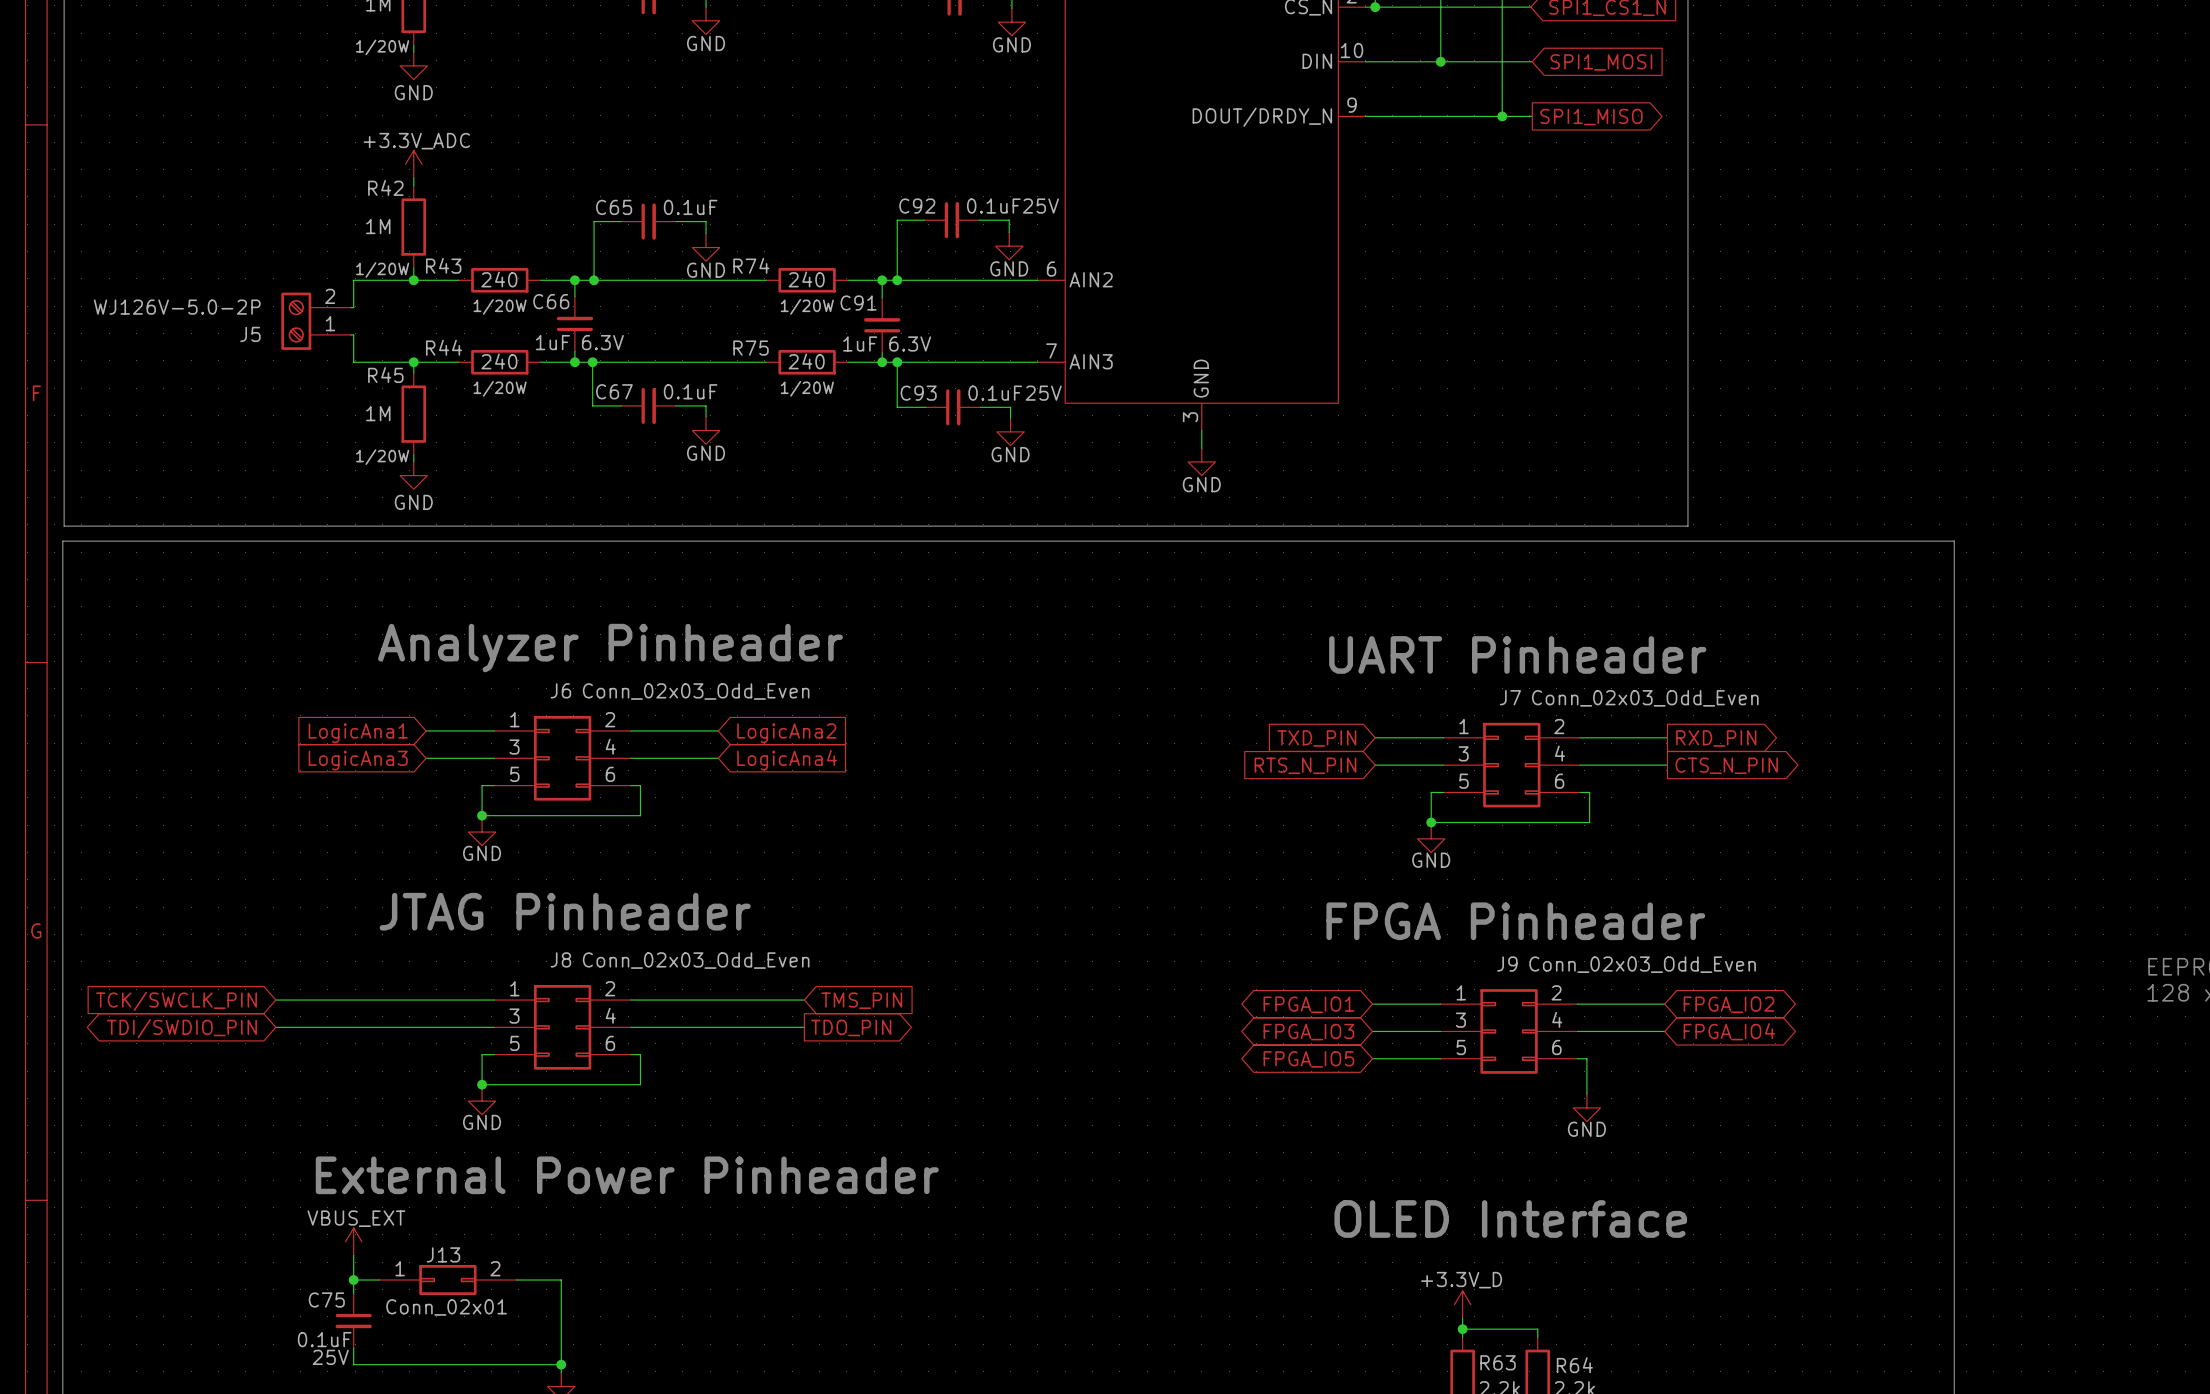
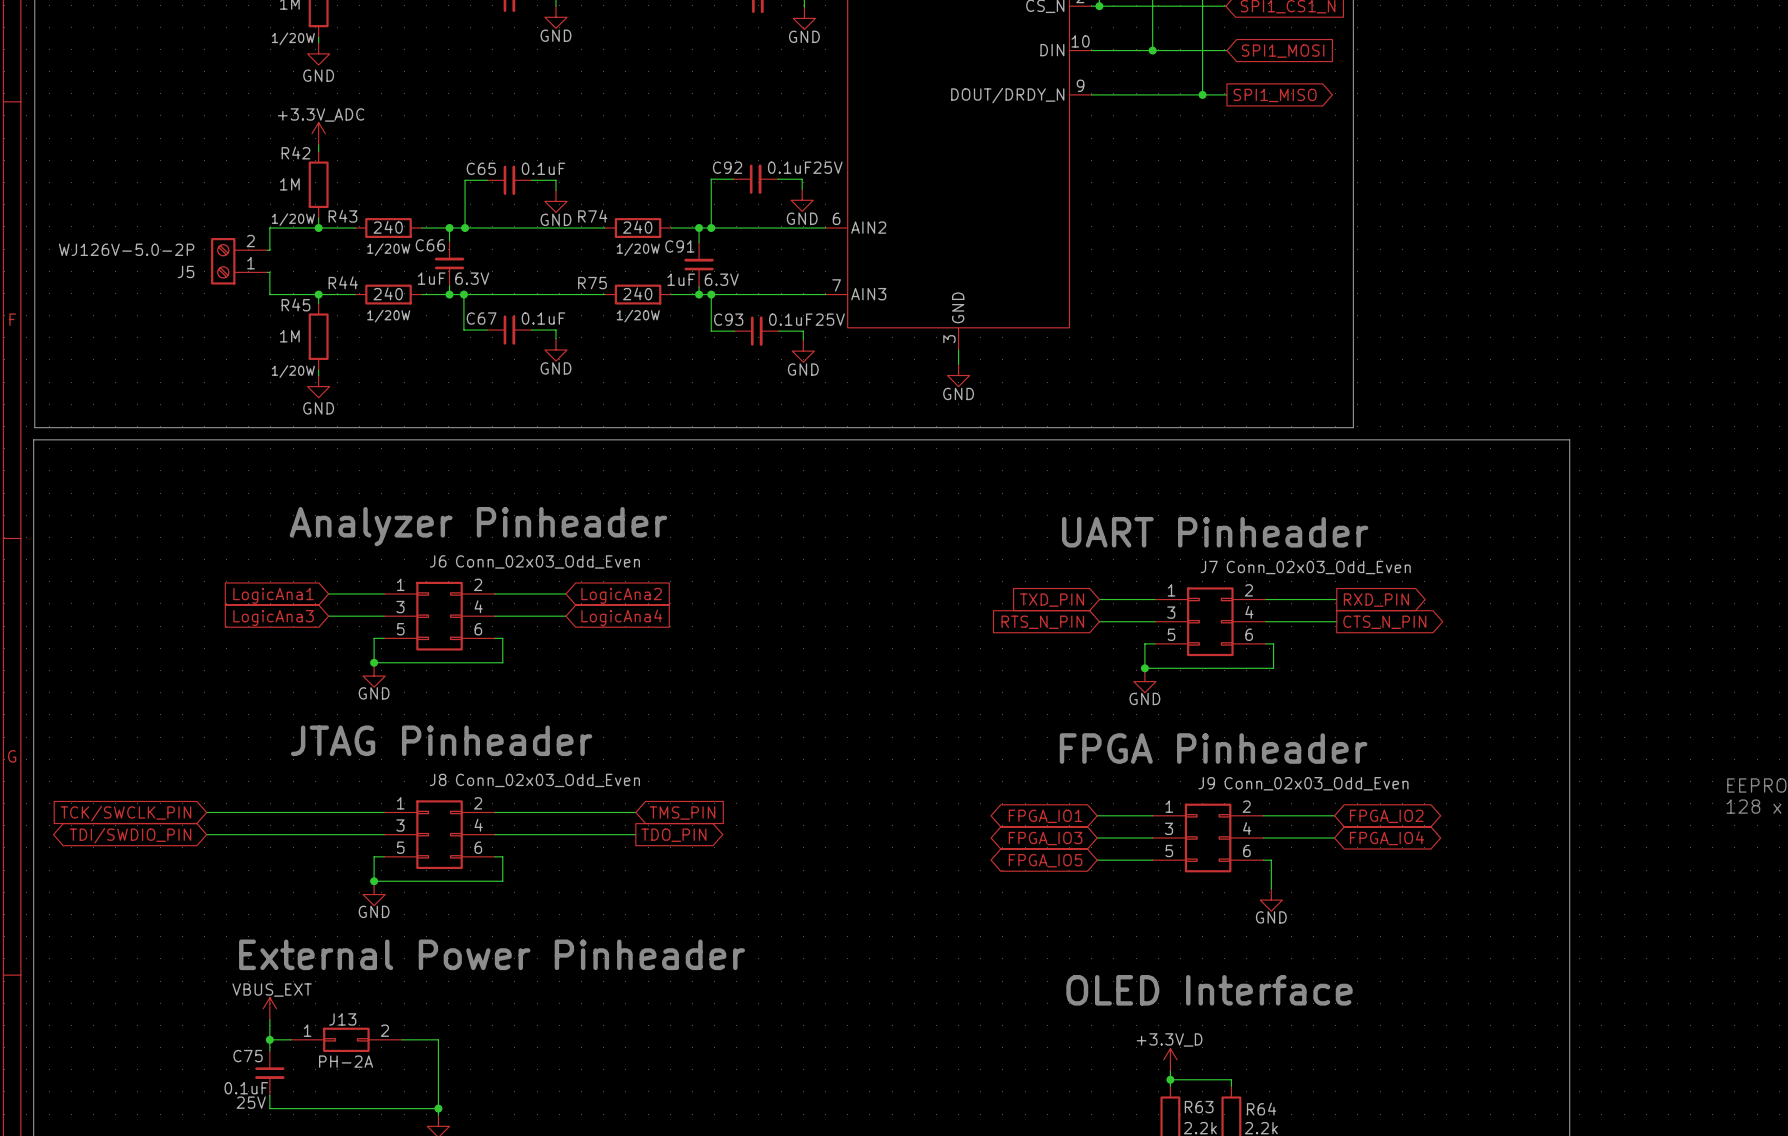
J13 value: Conn_02x01 (446, 1307) -> PH-2A (346, 1061)

